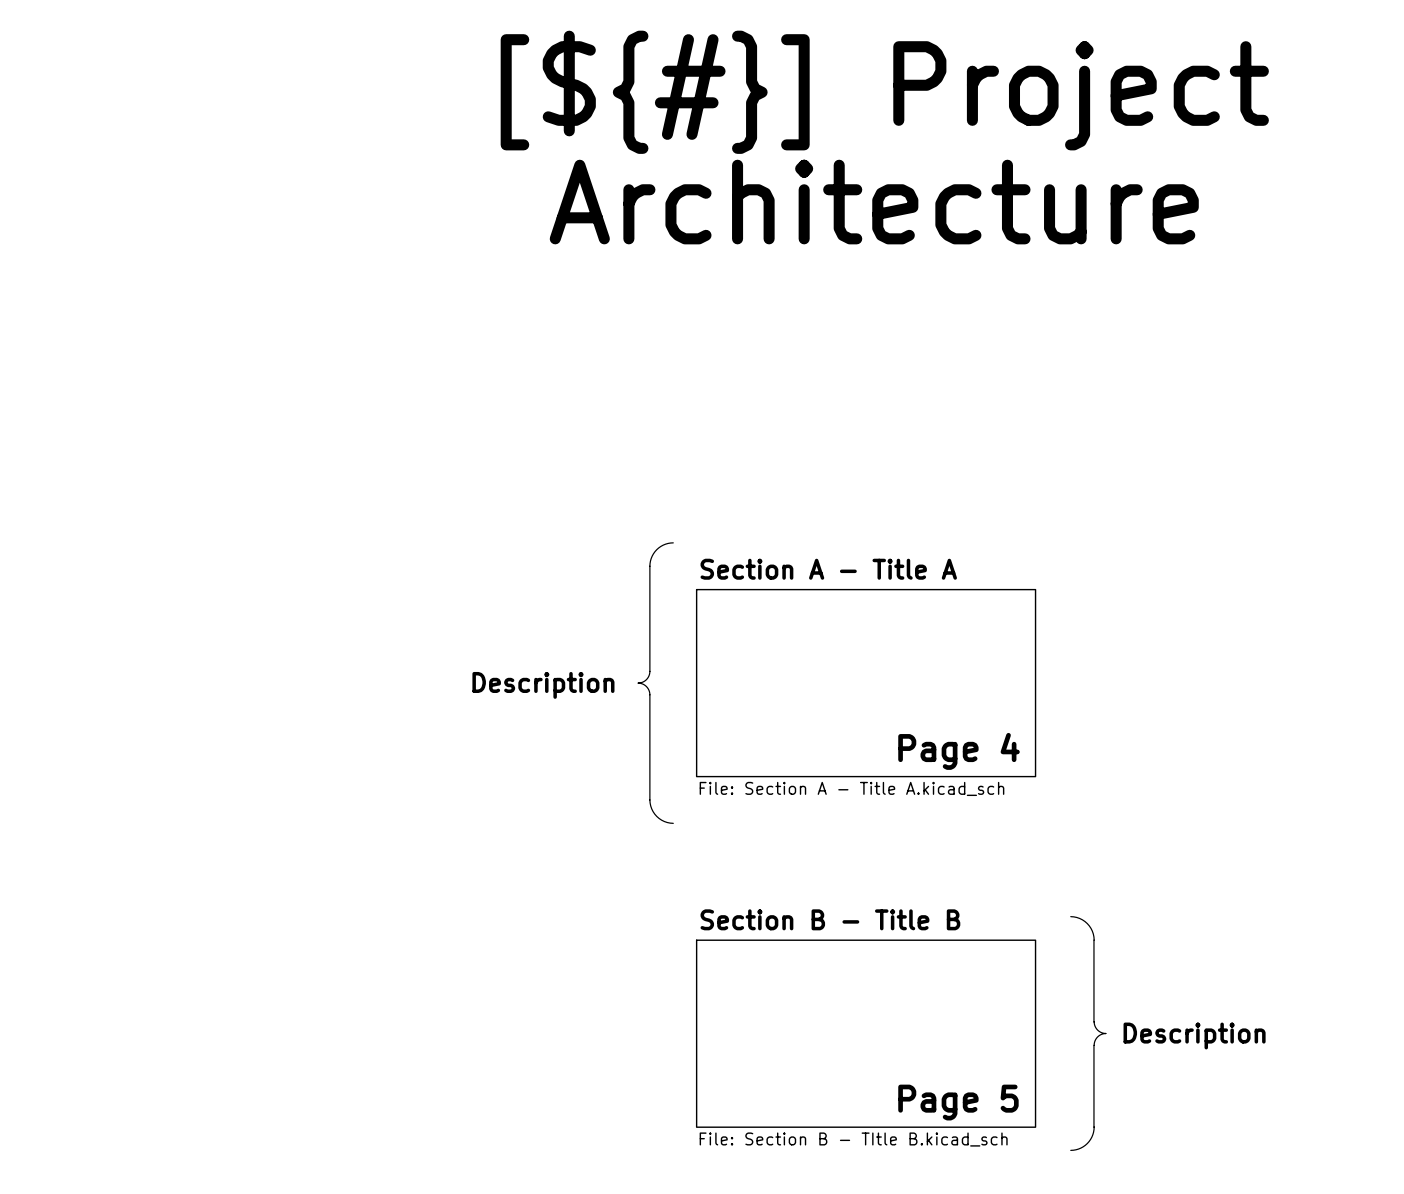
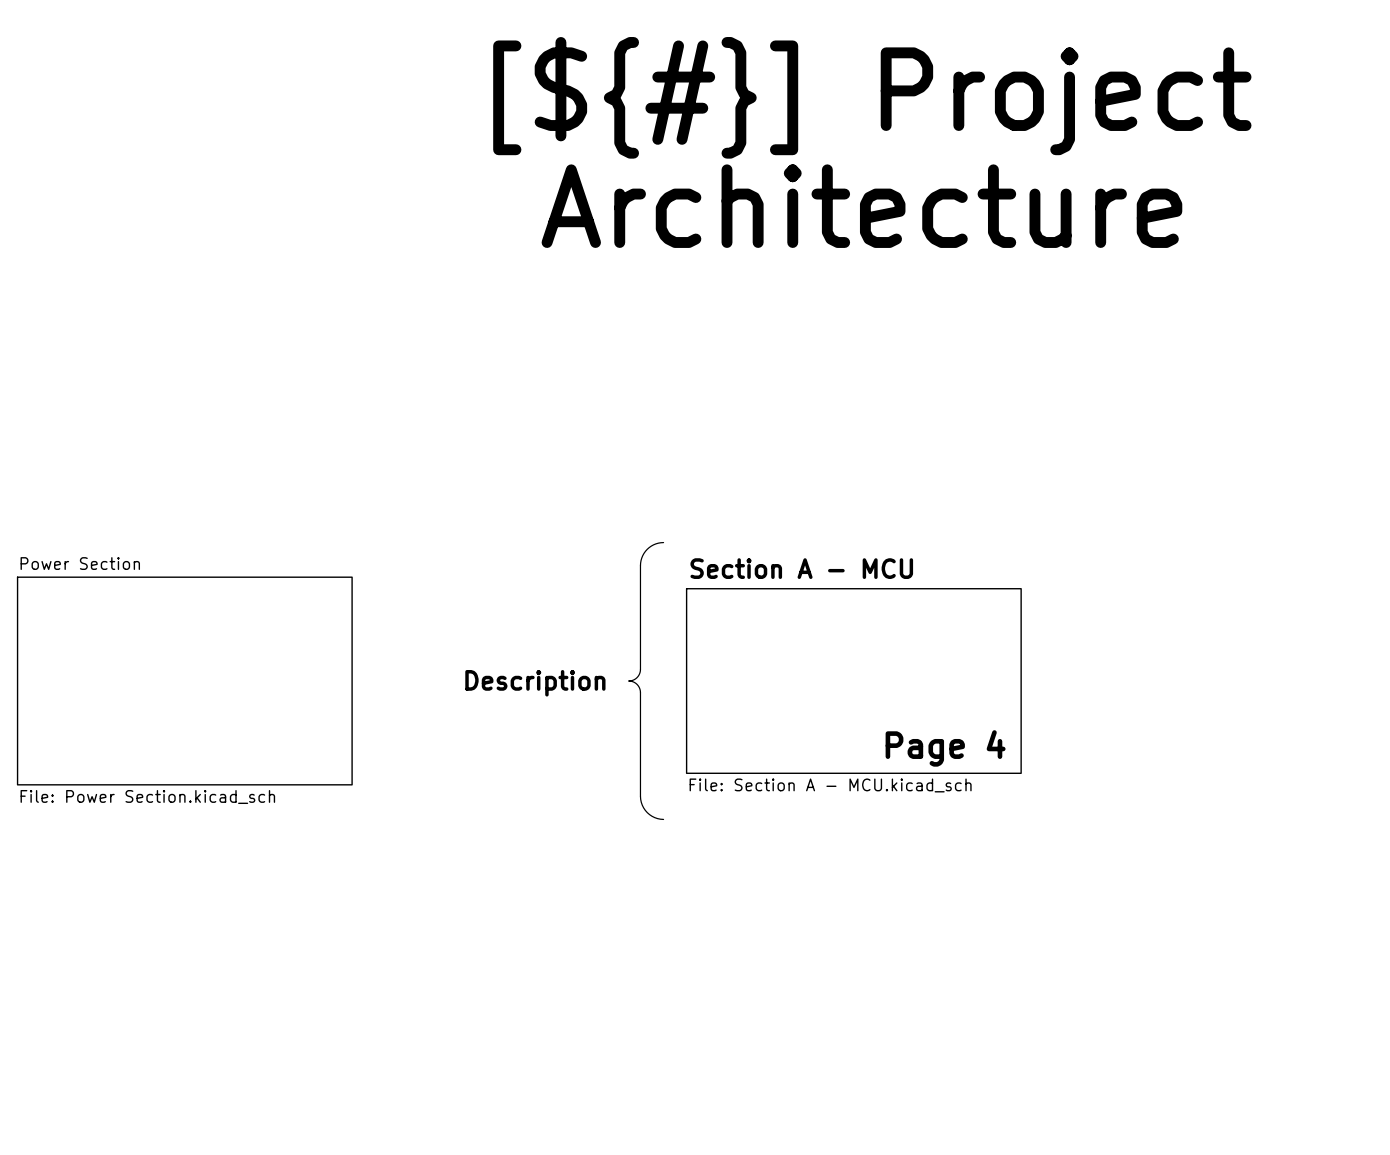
sheet Section A - Title A name: Section A - Title A (828, 569) -> Section A - MCU (801, 568)
sheet Power Section: none -> File: Power Section.kicad_sch (184, 681)
sheet Section A - Title A value: File: Section A - Title A.kicad_sch (851, 788) -> File: Section A - MCU.kicad_sch (830, 785)
line: (1070, 916) (1079, 918) (1087, 923) (1092, 931) (1094, 940) -> none
line: (1093, 940) (1093, 1022) -> none
line: (1094, 1021) (1097, 1030) (1105, 1033) (1097, 1036) (1094, 1045) -> none
sheet Section B - Title B: File: Section B - TItle B.kicad_sch (866, 1033) -> none
text: Description (1194, 1035) -> none
line: (1093, 1045) (1093, 1127) -> none
text: Page 5 (958, 1102) -> none
line: (1094, 1127) (1092, 1134) (1087, 1143) (1078, 1149) (1070, 1150) -> none

